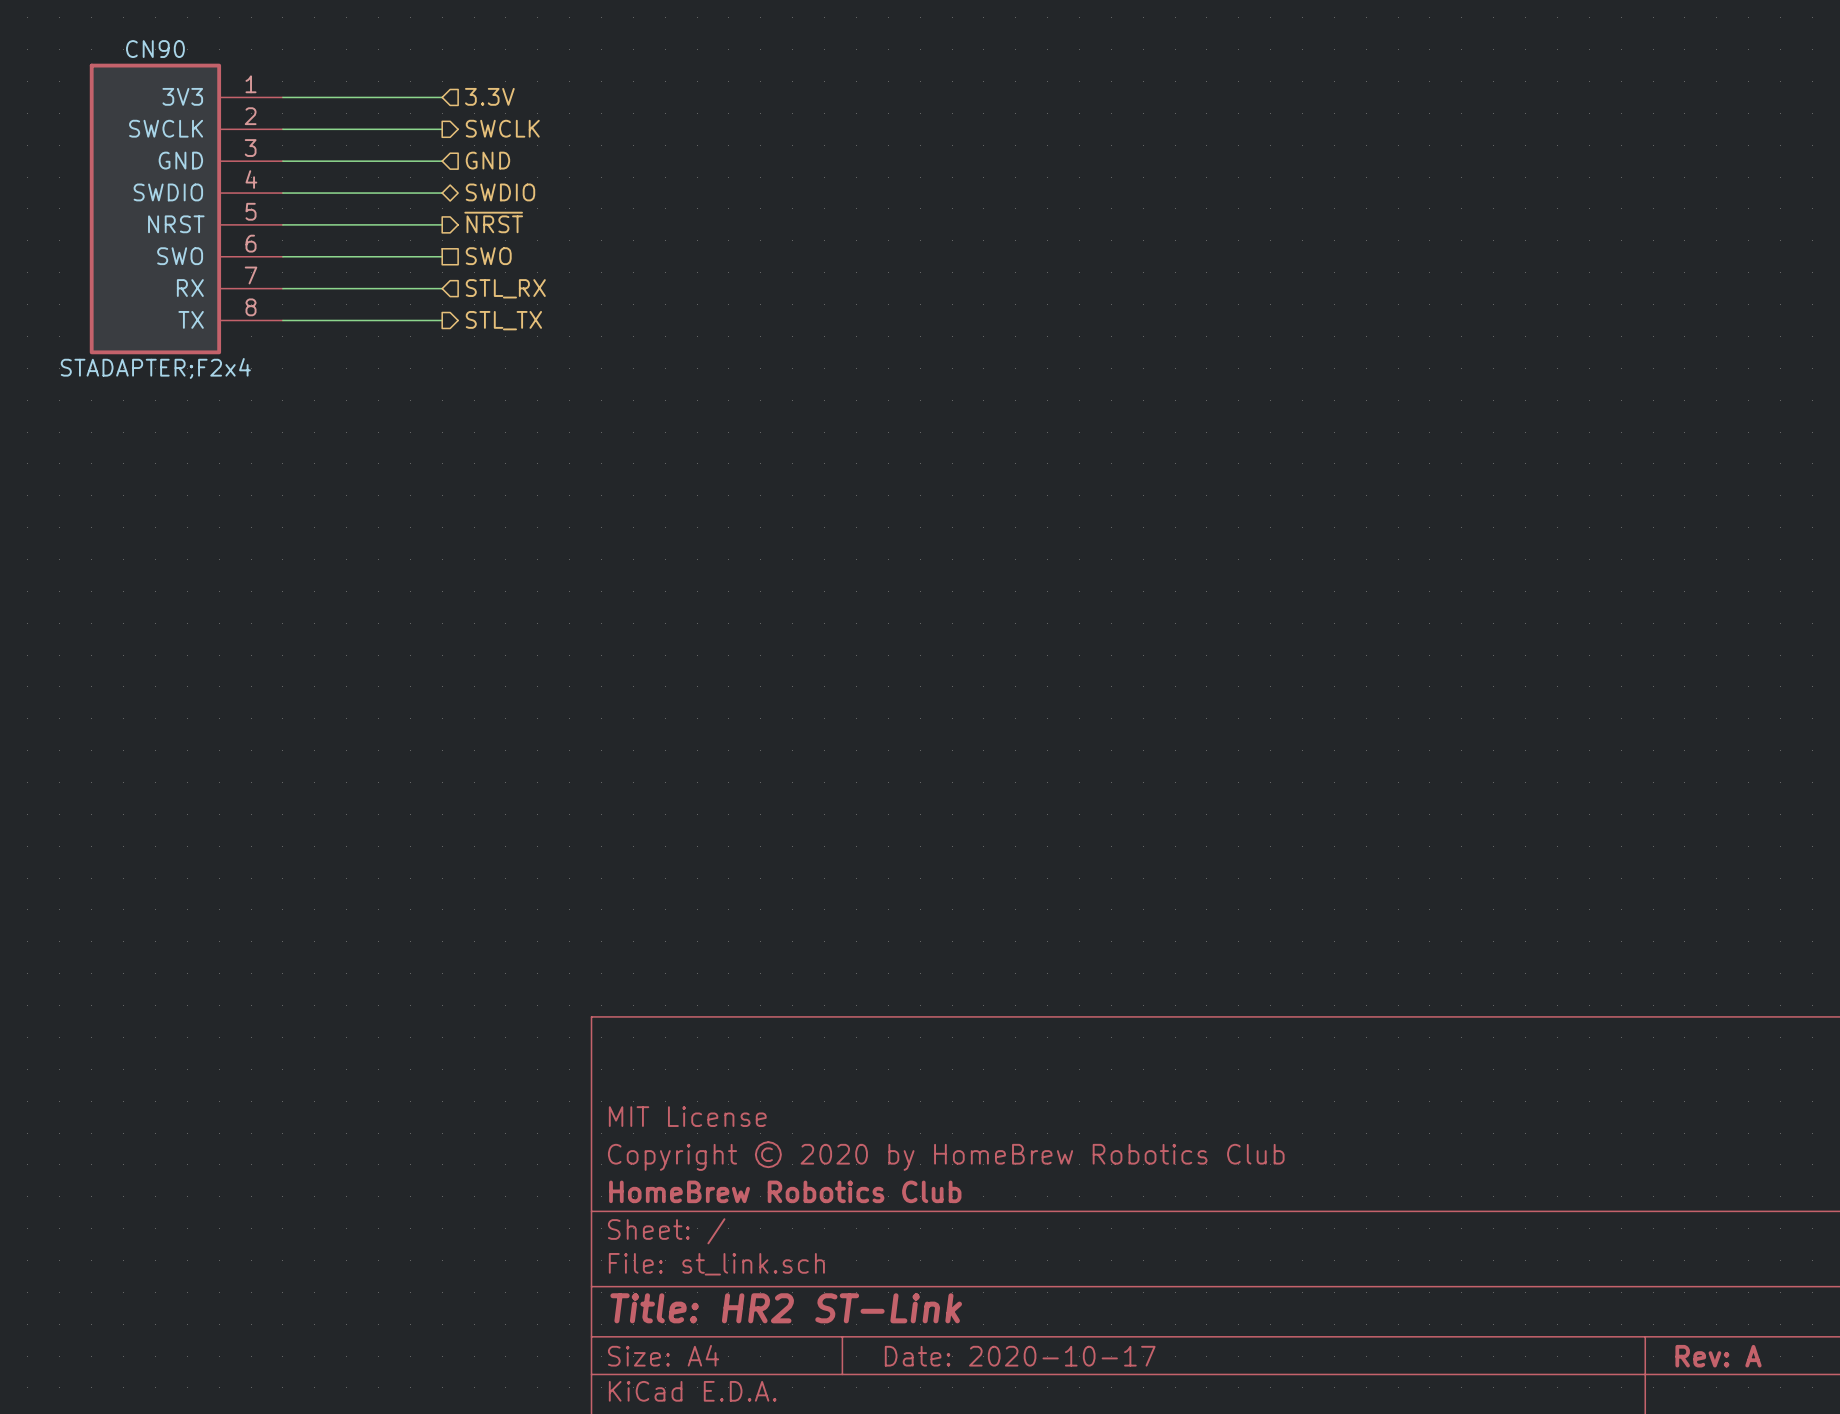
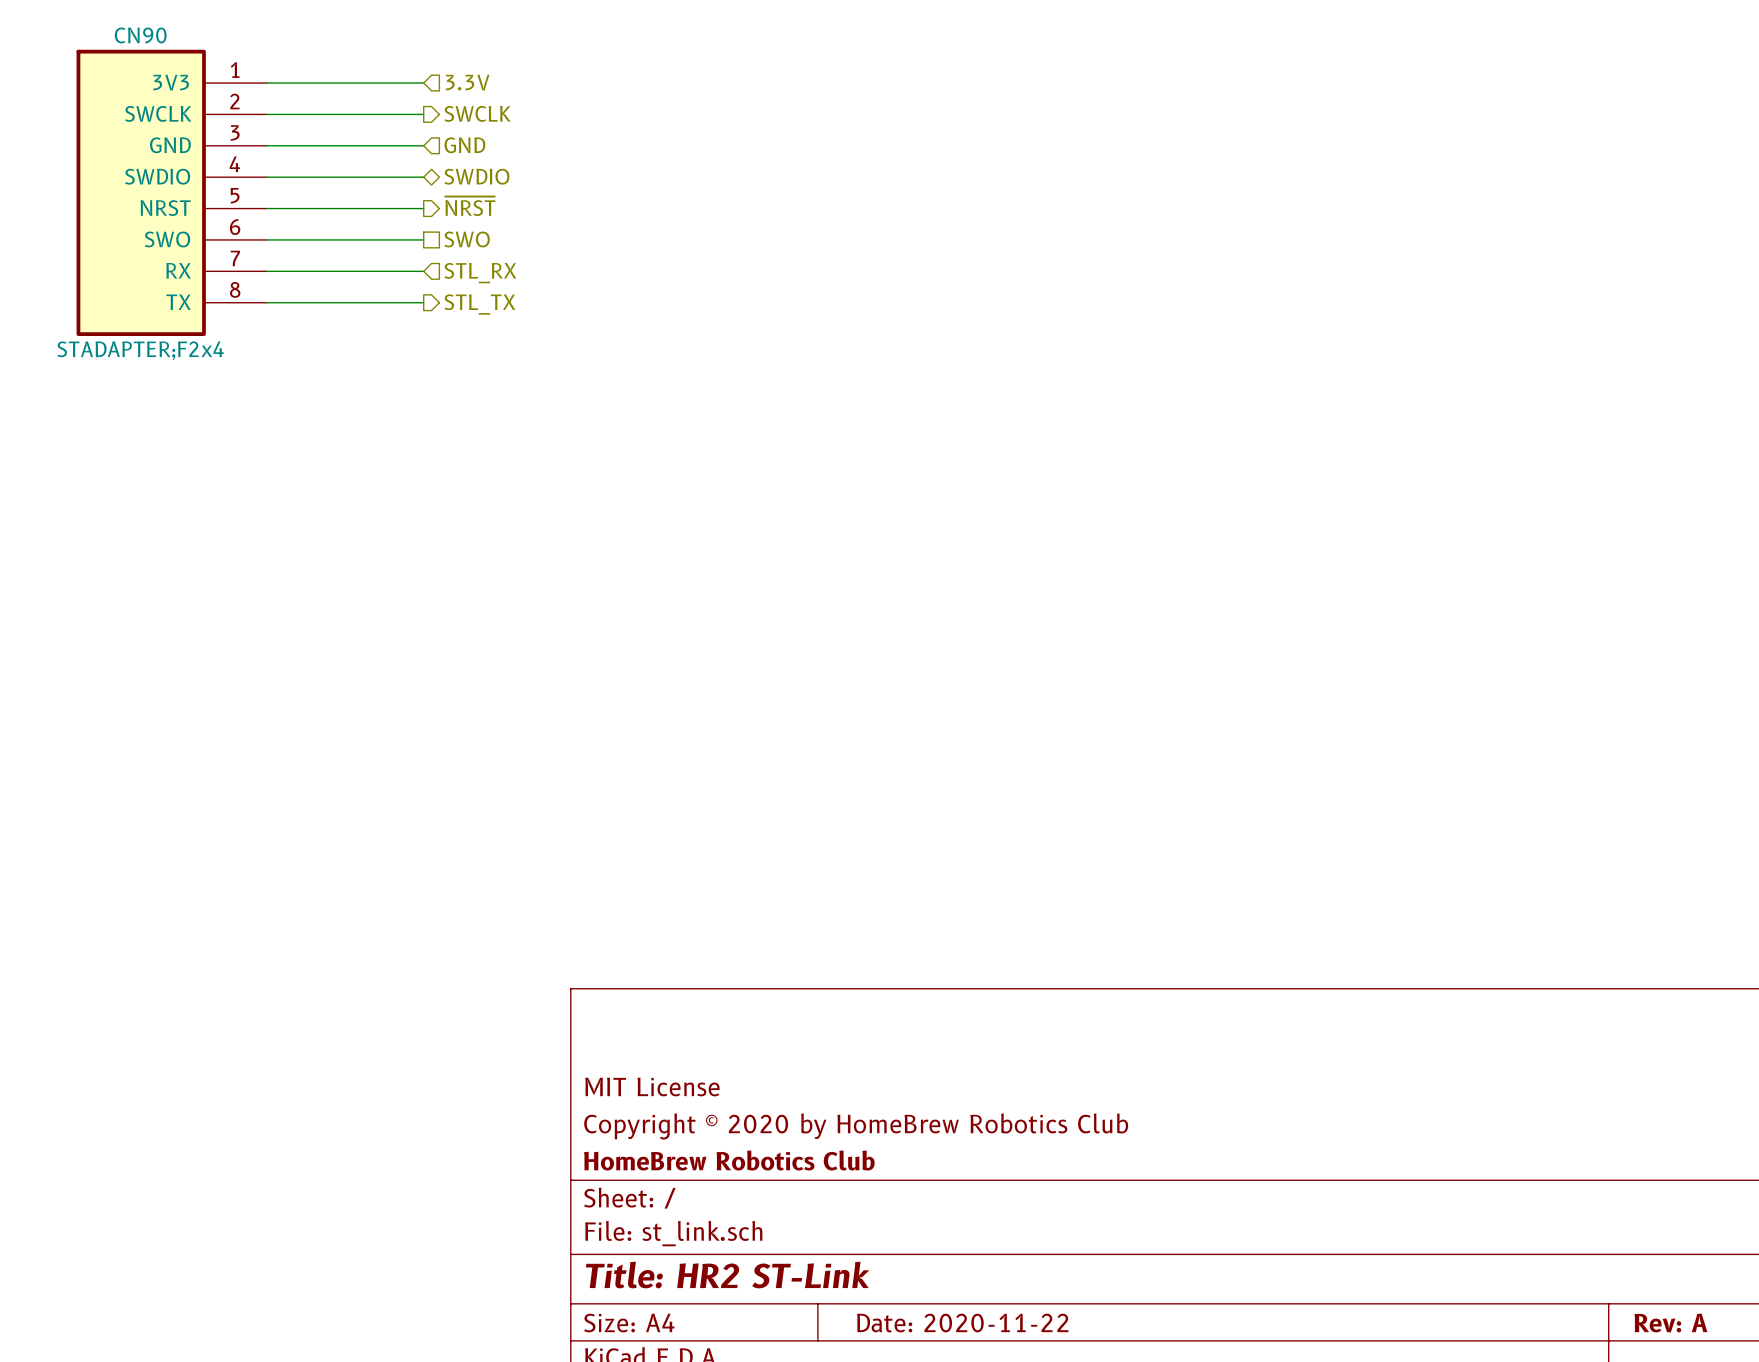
title block: Date: 2020-10-17 (1020, 1356) -> Date: 2020-11-22 (962, 1323)

